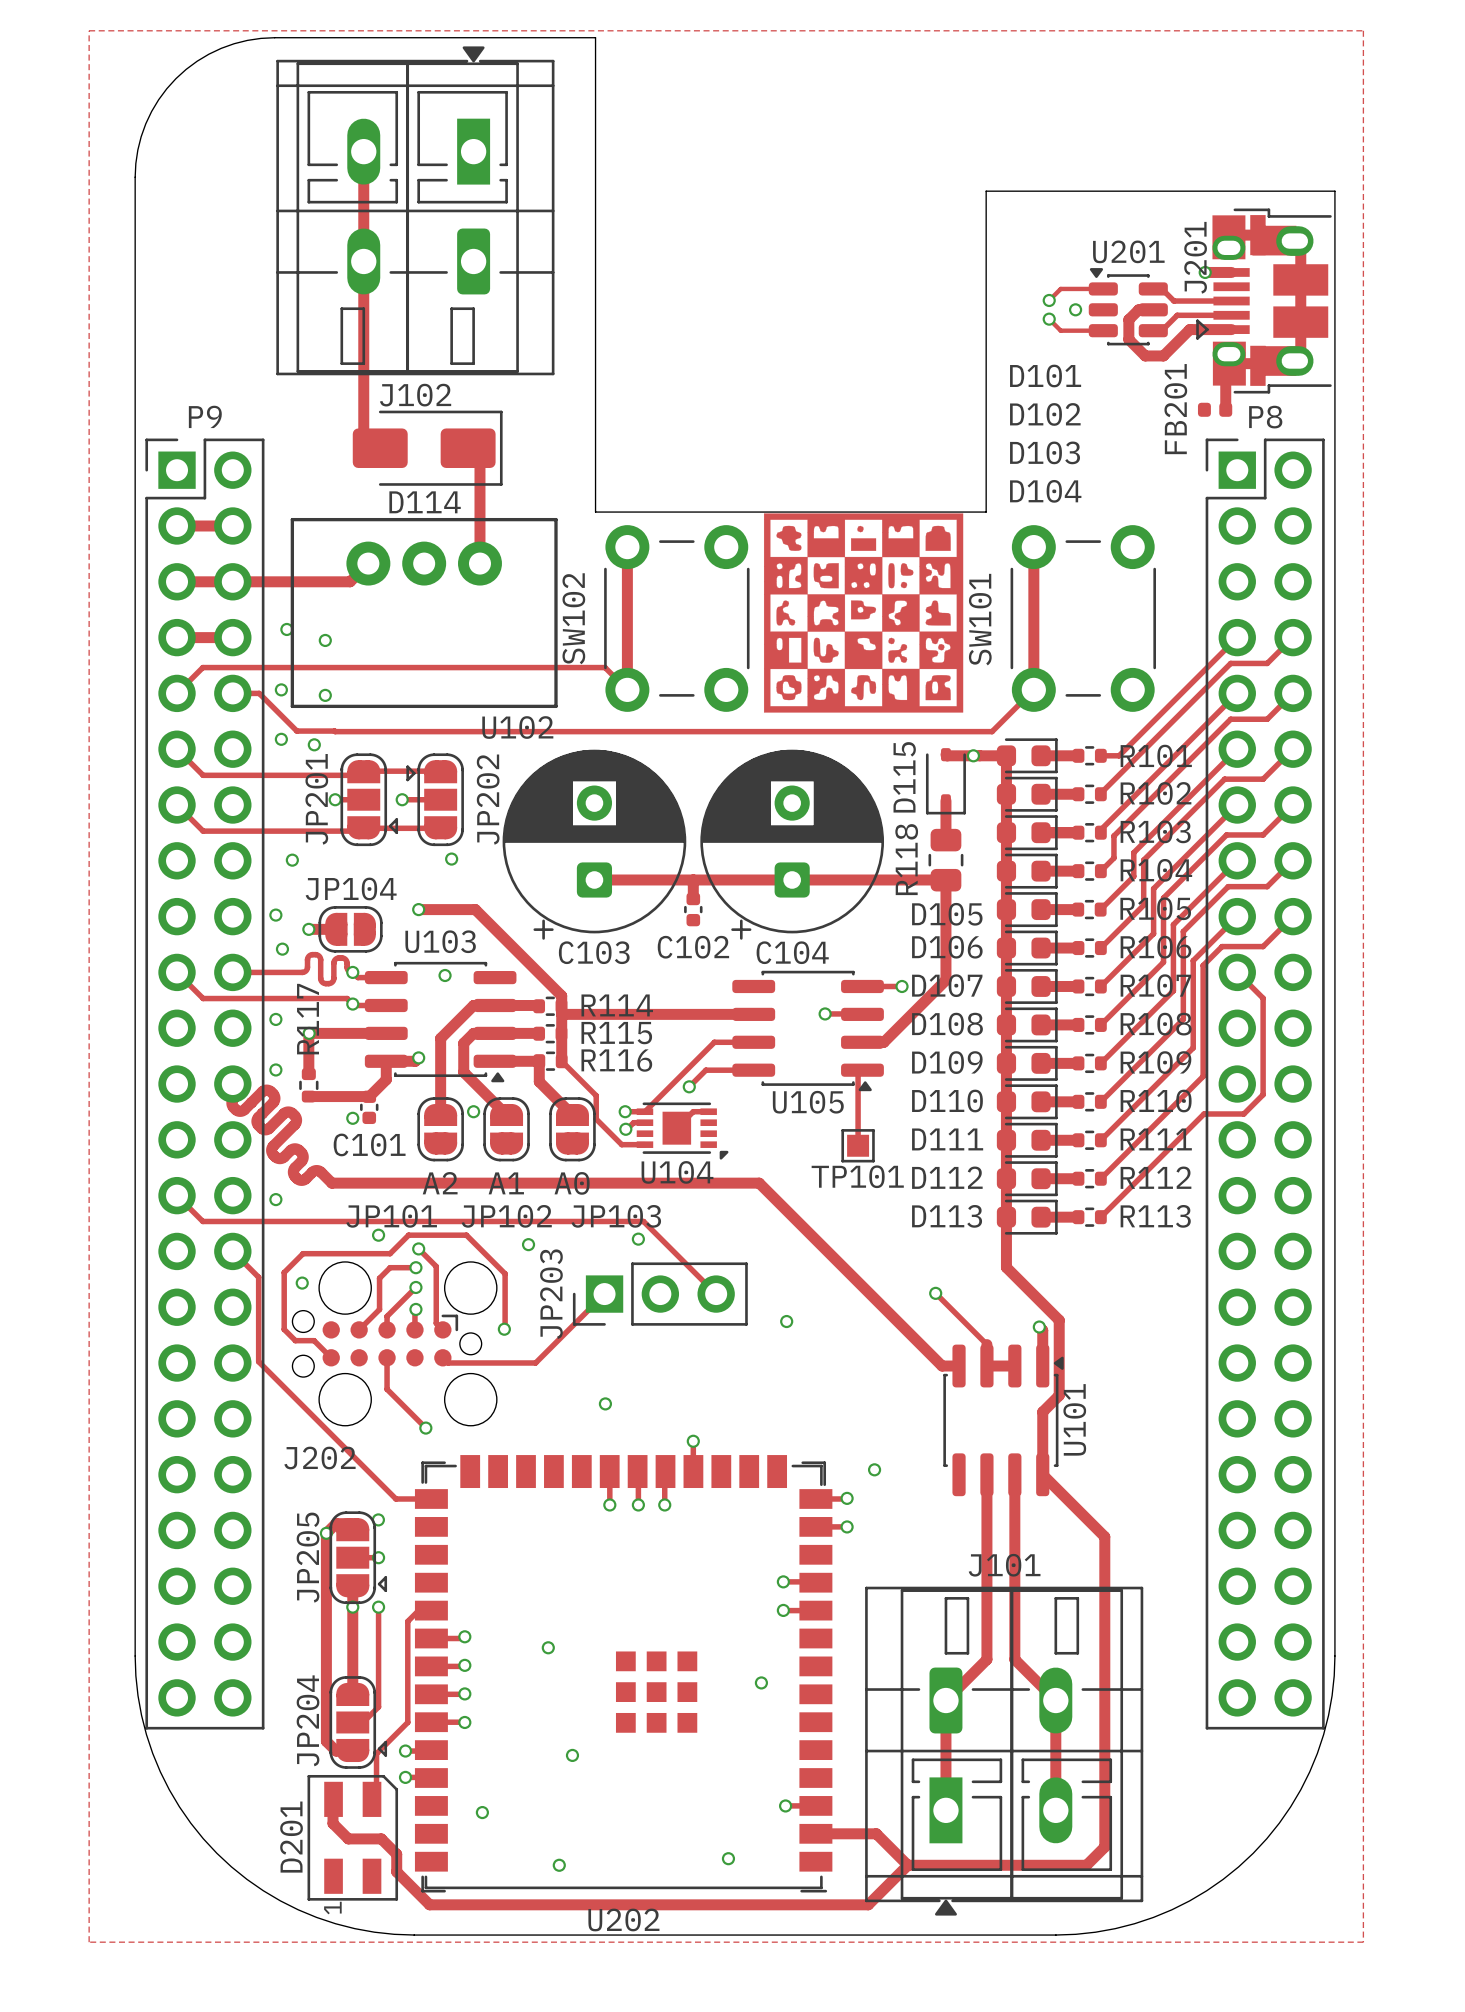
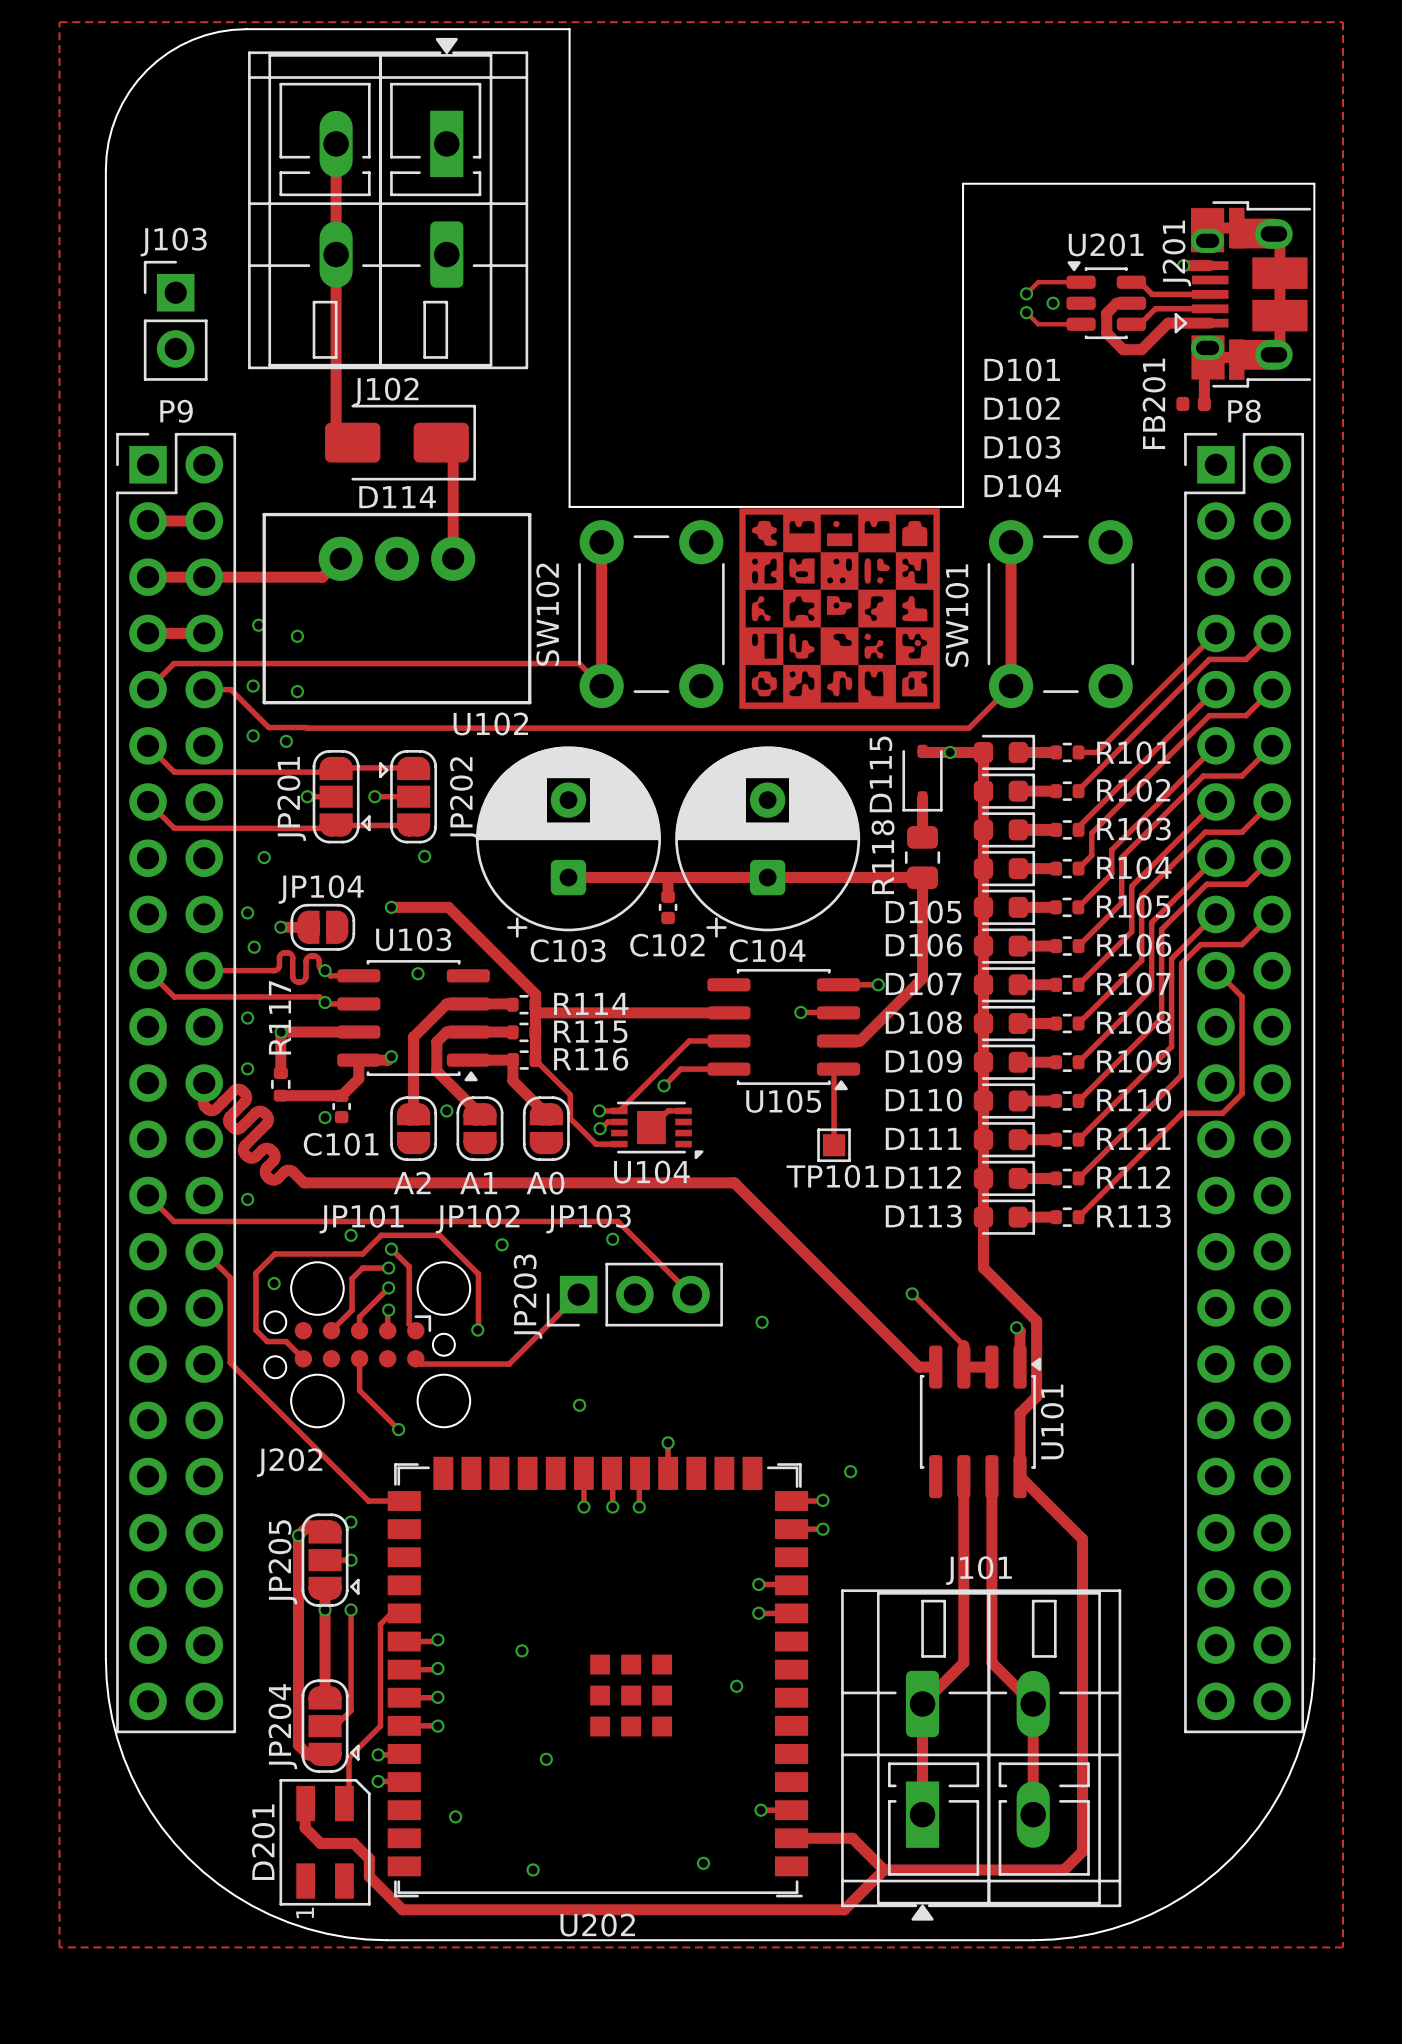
J103: none -> (175, 320)

